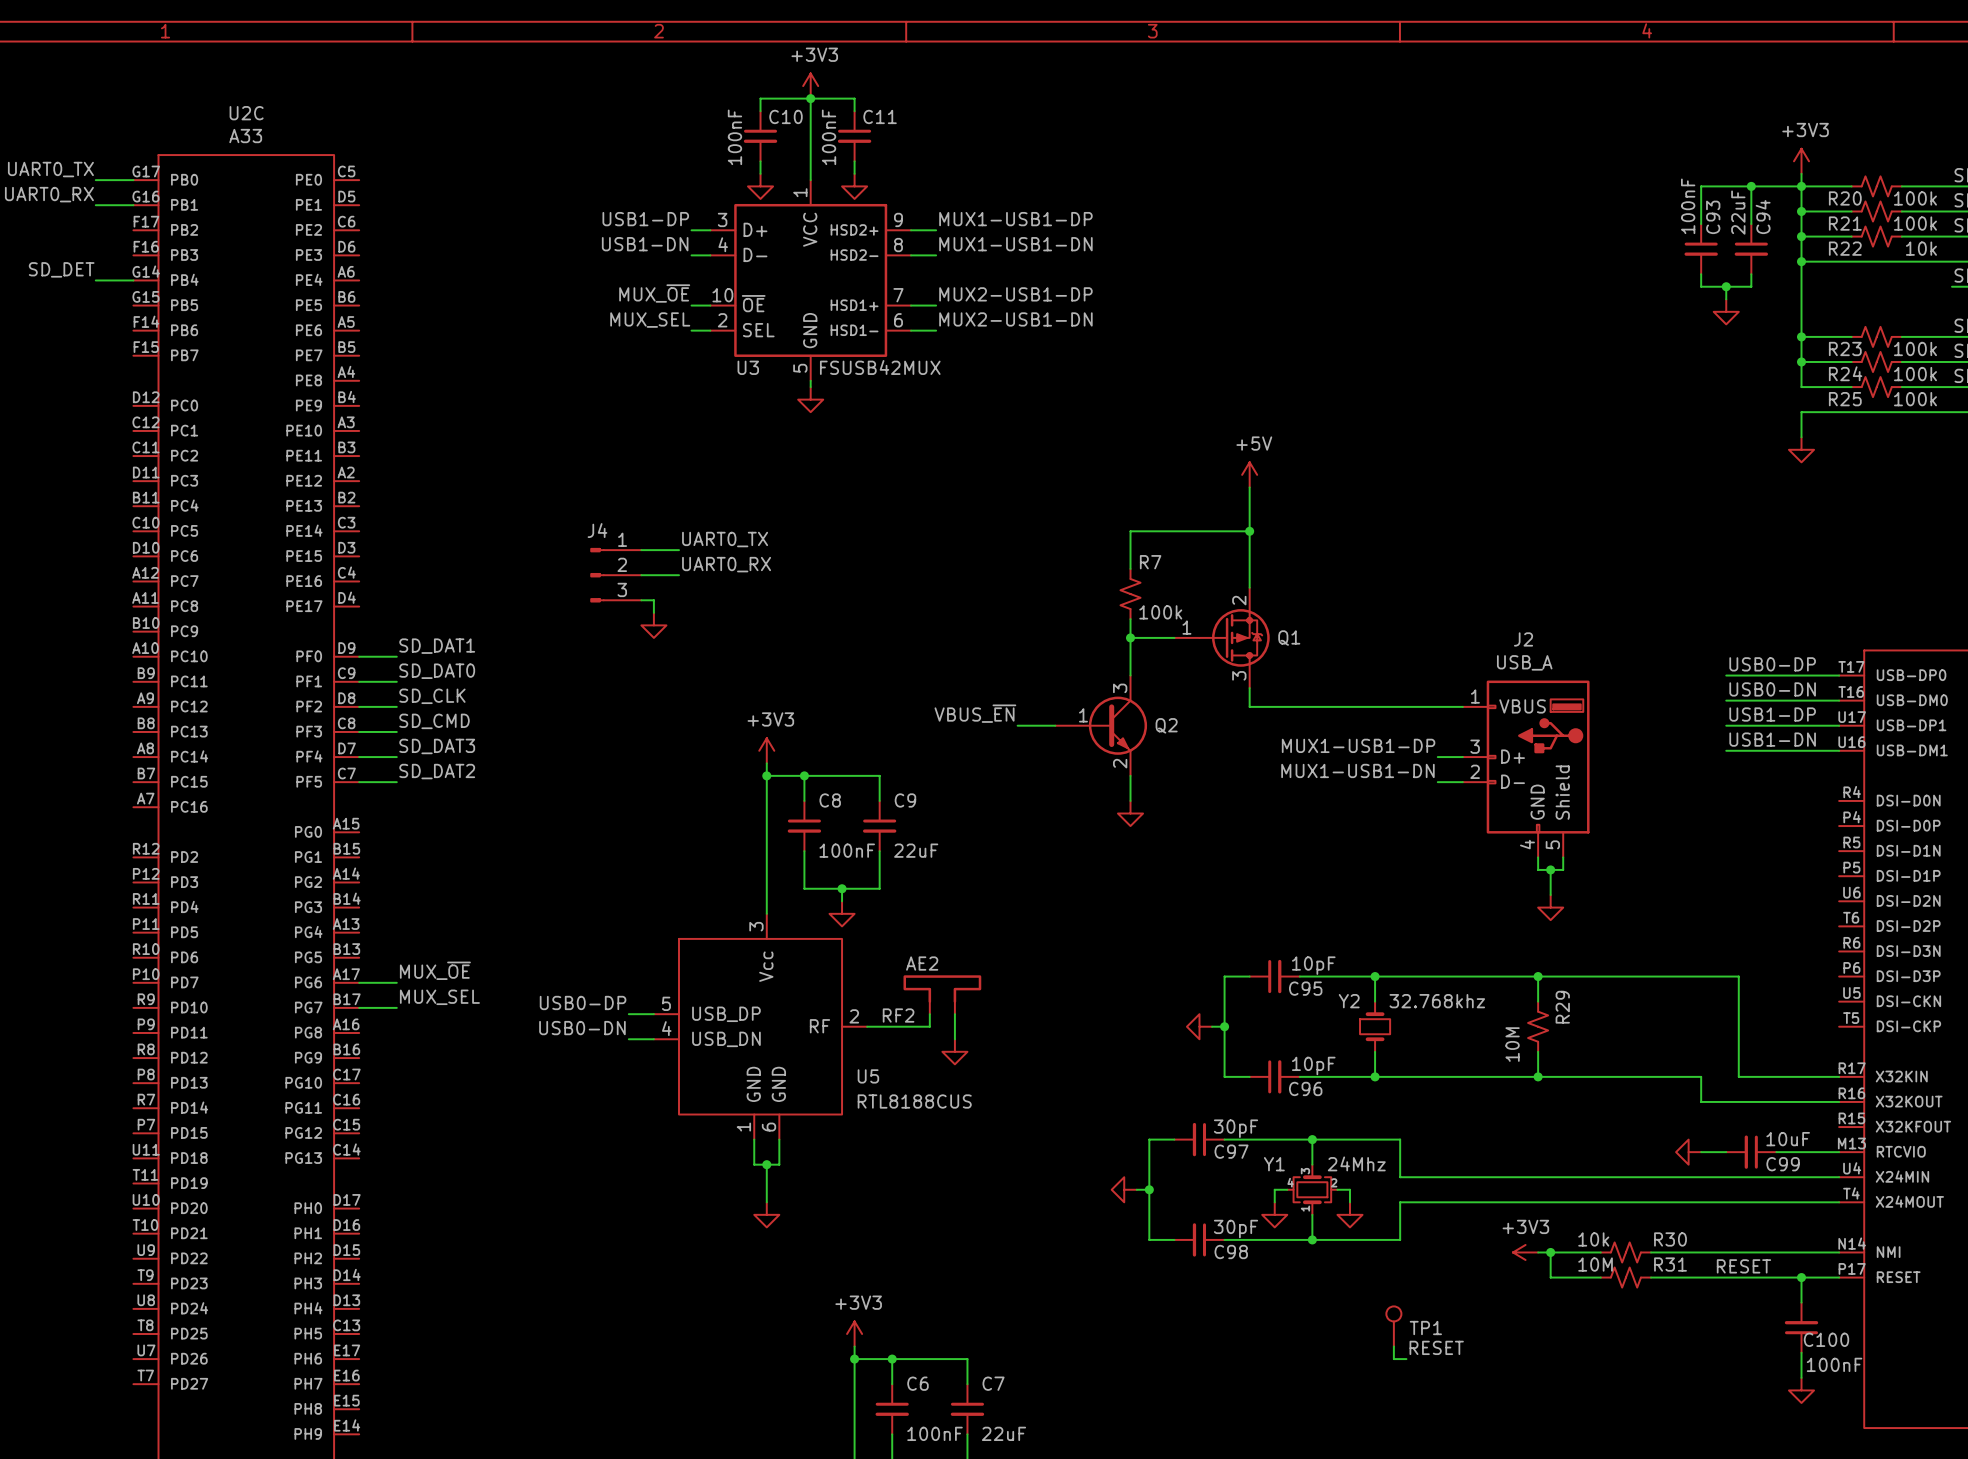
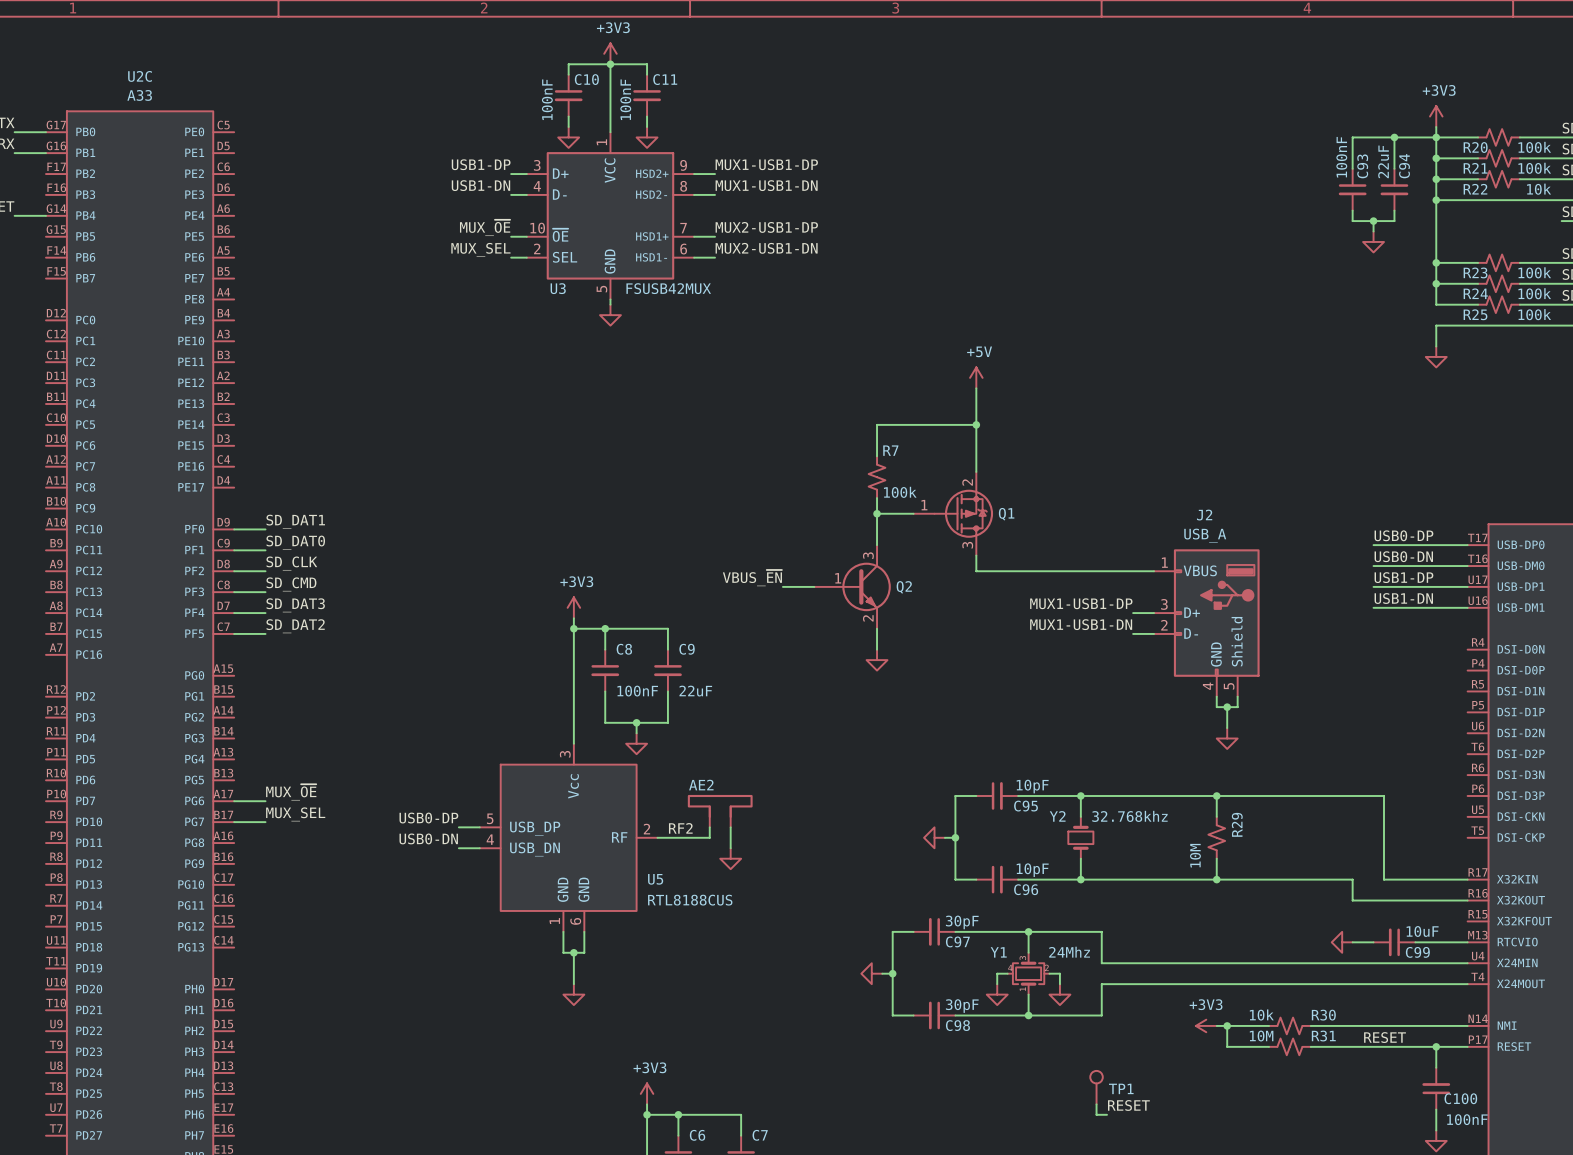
label: UART0_TX (725, 539) -> none
wire: (641, 550) (679, 550) -> none
label: UART0_RX (726, 564) -> none
J4: (615, 575) -> none
wire: (641, 575) (679, 575) -> none
wire: (641, 600) (653, 600) (653, 612) -> none
power symbol: (653, 625) -> none

